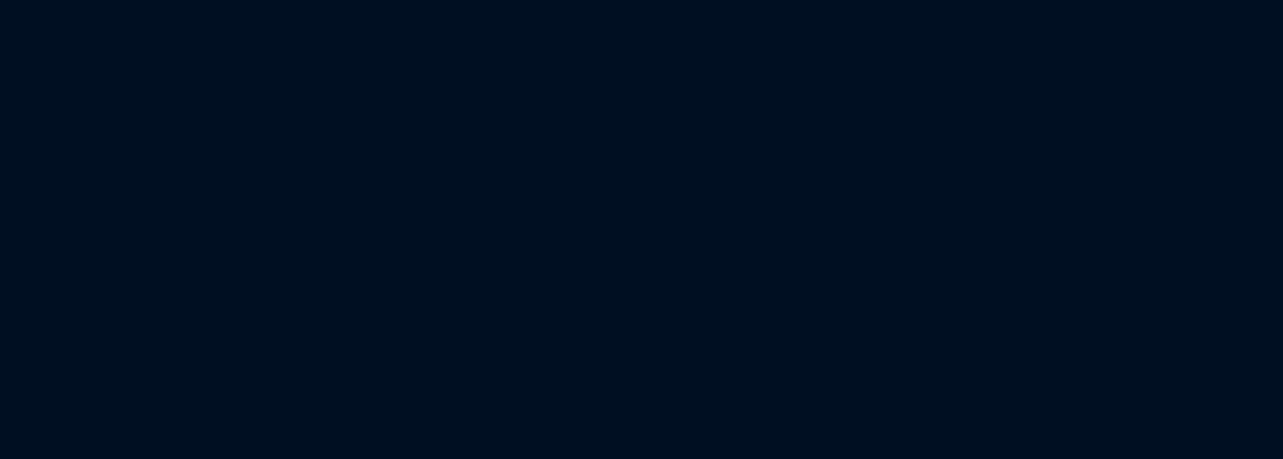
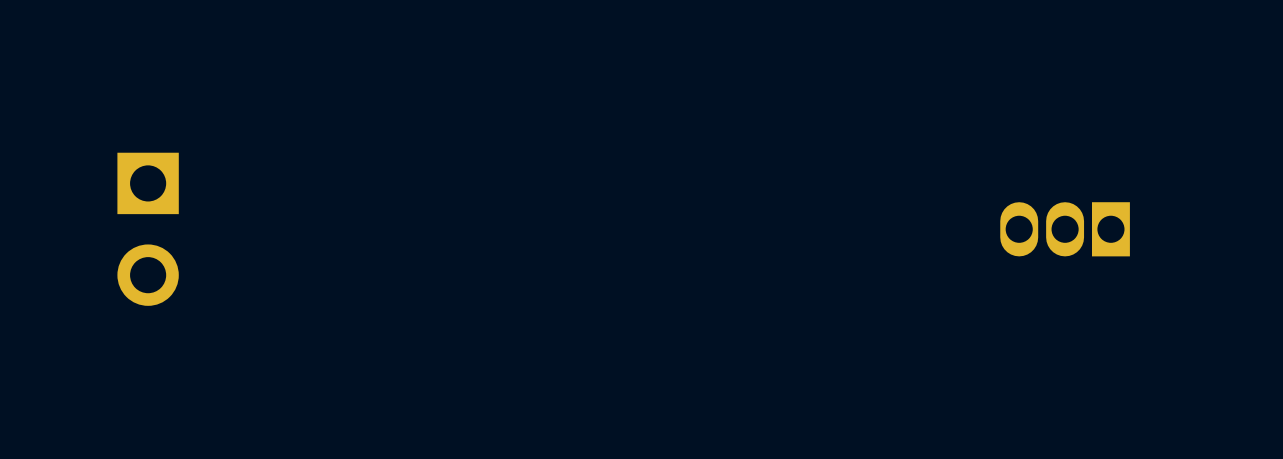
part: none -> (148, 229)
part: none -> (1065, 229)

